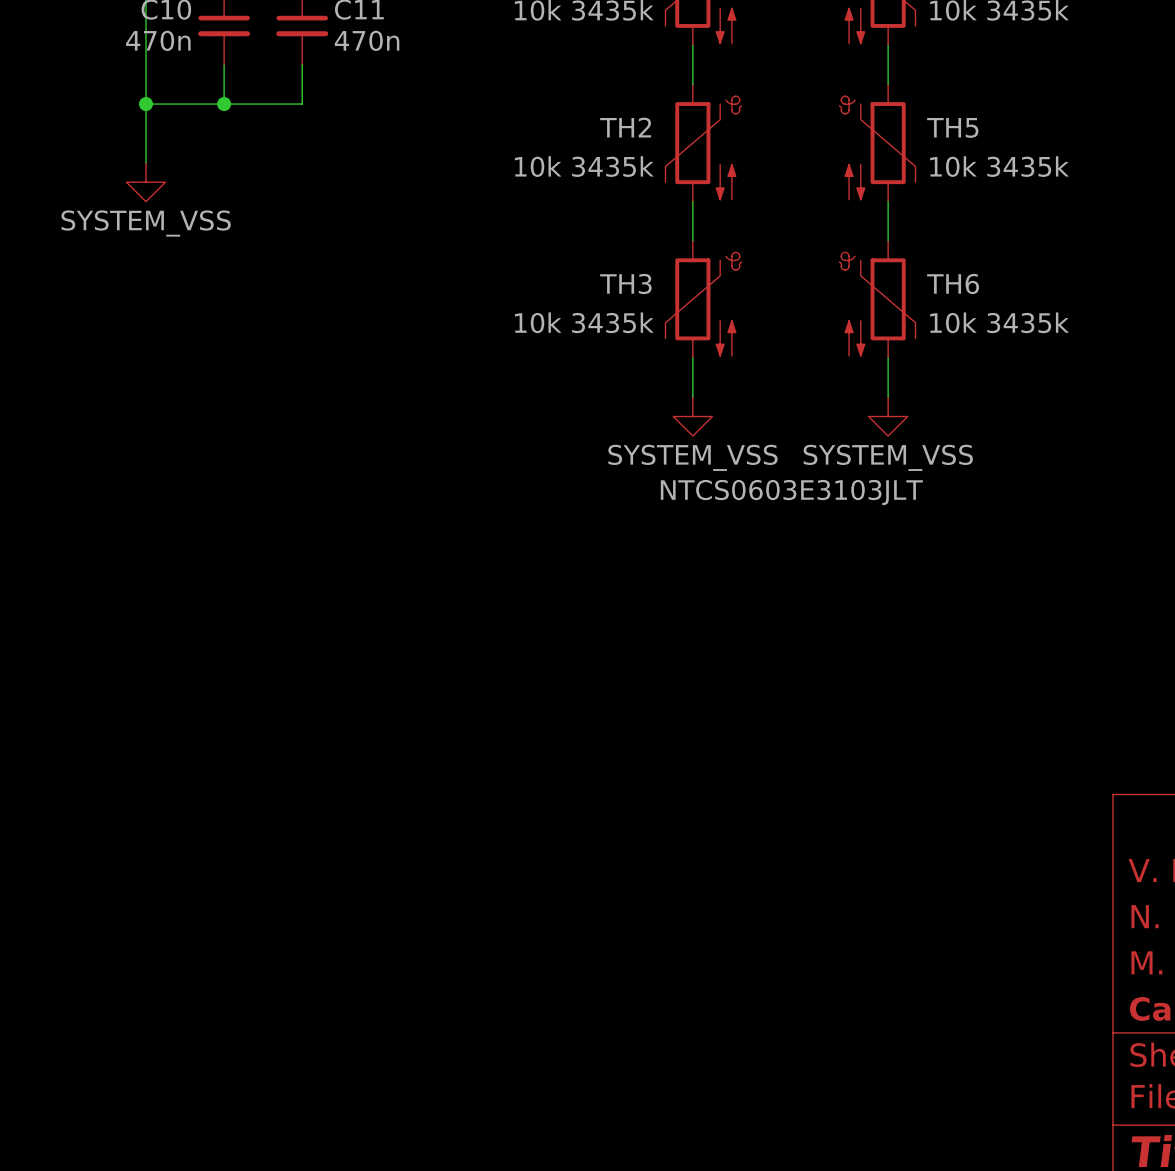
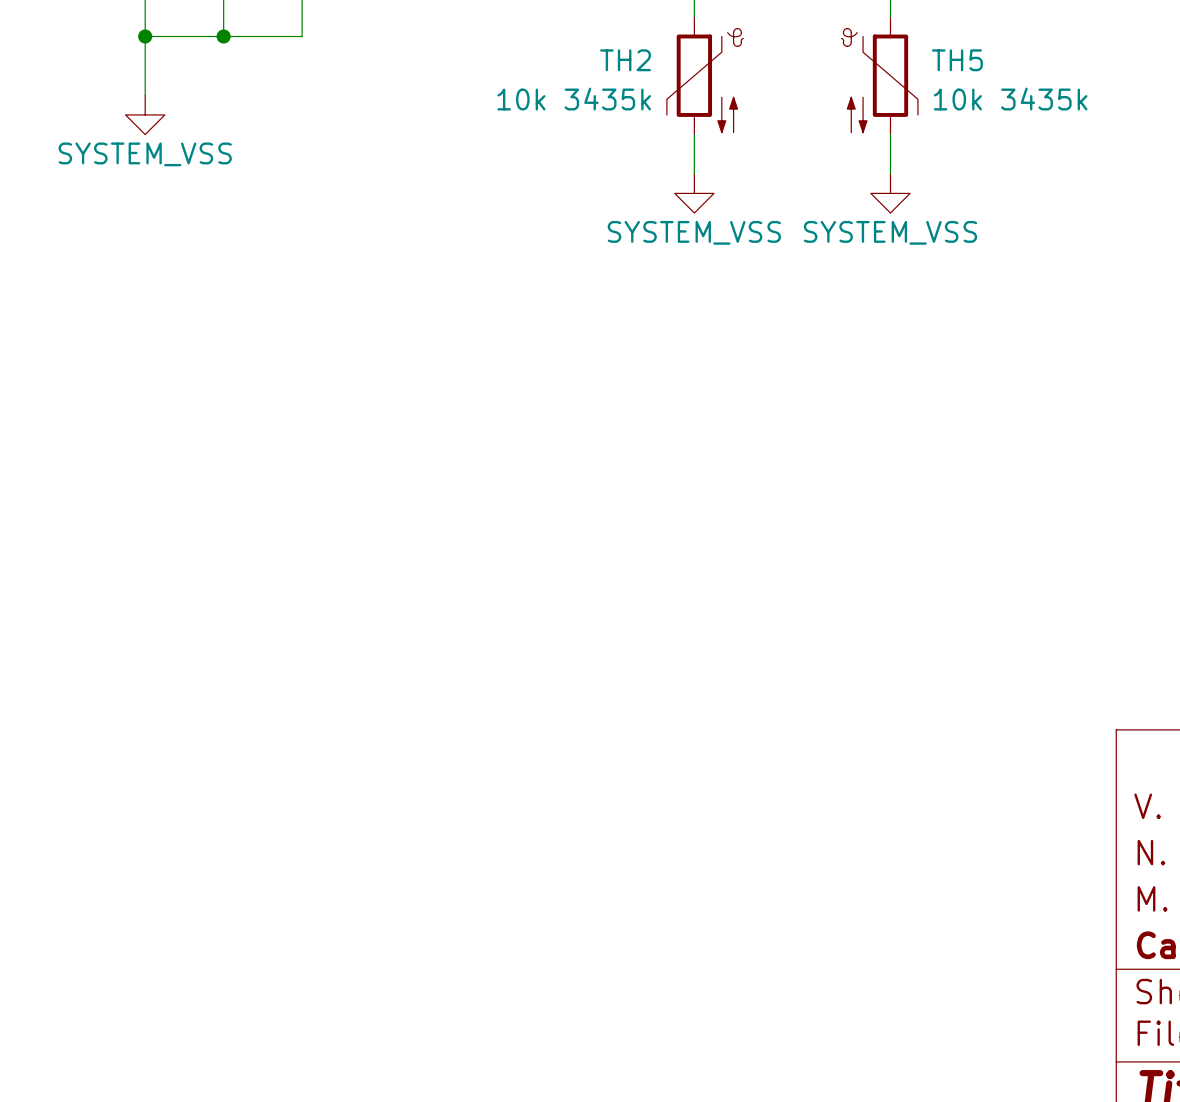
power symbol: none -> SYSTEM_VSS (694, 193)
power symbol: none -> SYSTEM_VSS (890, 193)
TH3: 10k 3435k (703, 299) -> none
TH6: 10k 3435k (877, 299) -> none
wire: (692, 357) (692, 397) -> none
wire: (888, 357) (888, 397) -> none
power symbol: SYSTEM_VSS (692, 416) -> none
power symbol: SYSTEM_VSS (888, 416) -> none
part text: NTCS0603E3103JLT (791, 492) -> none

